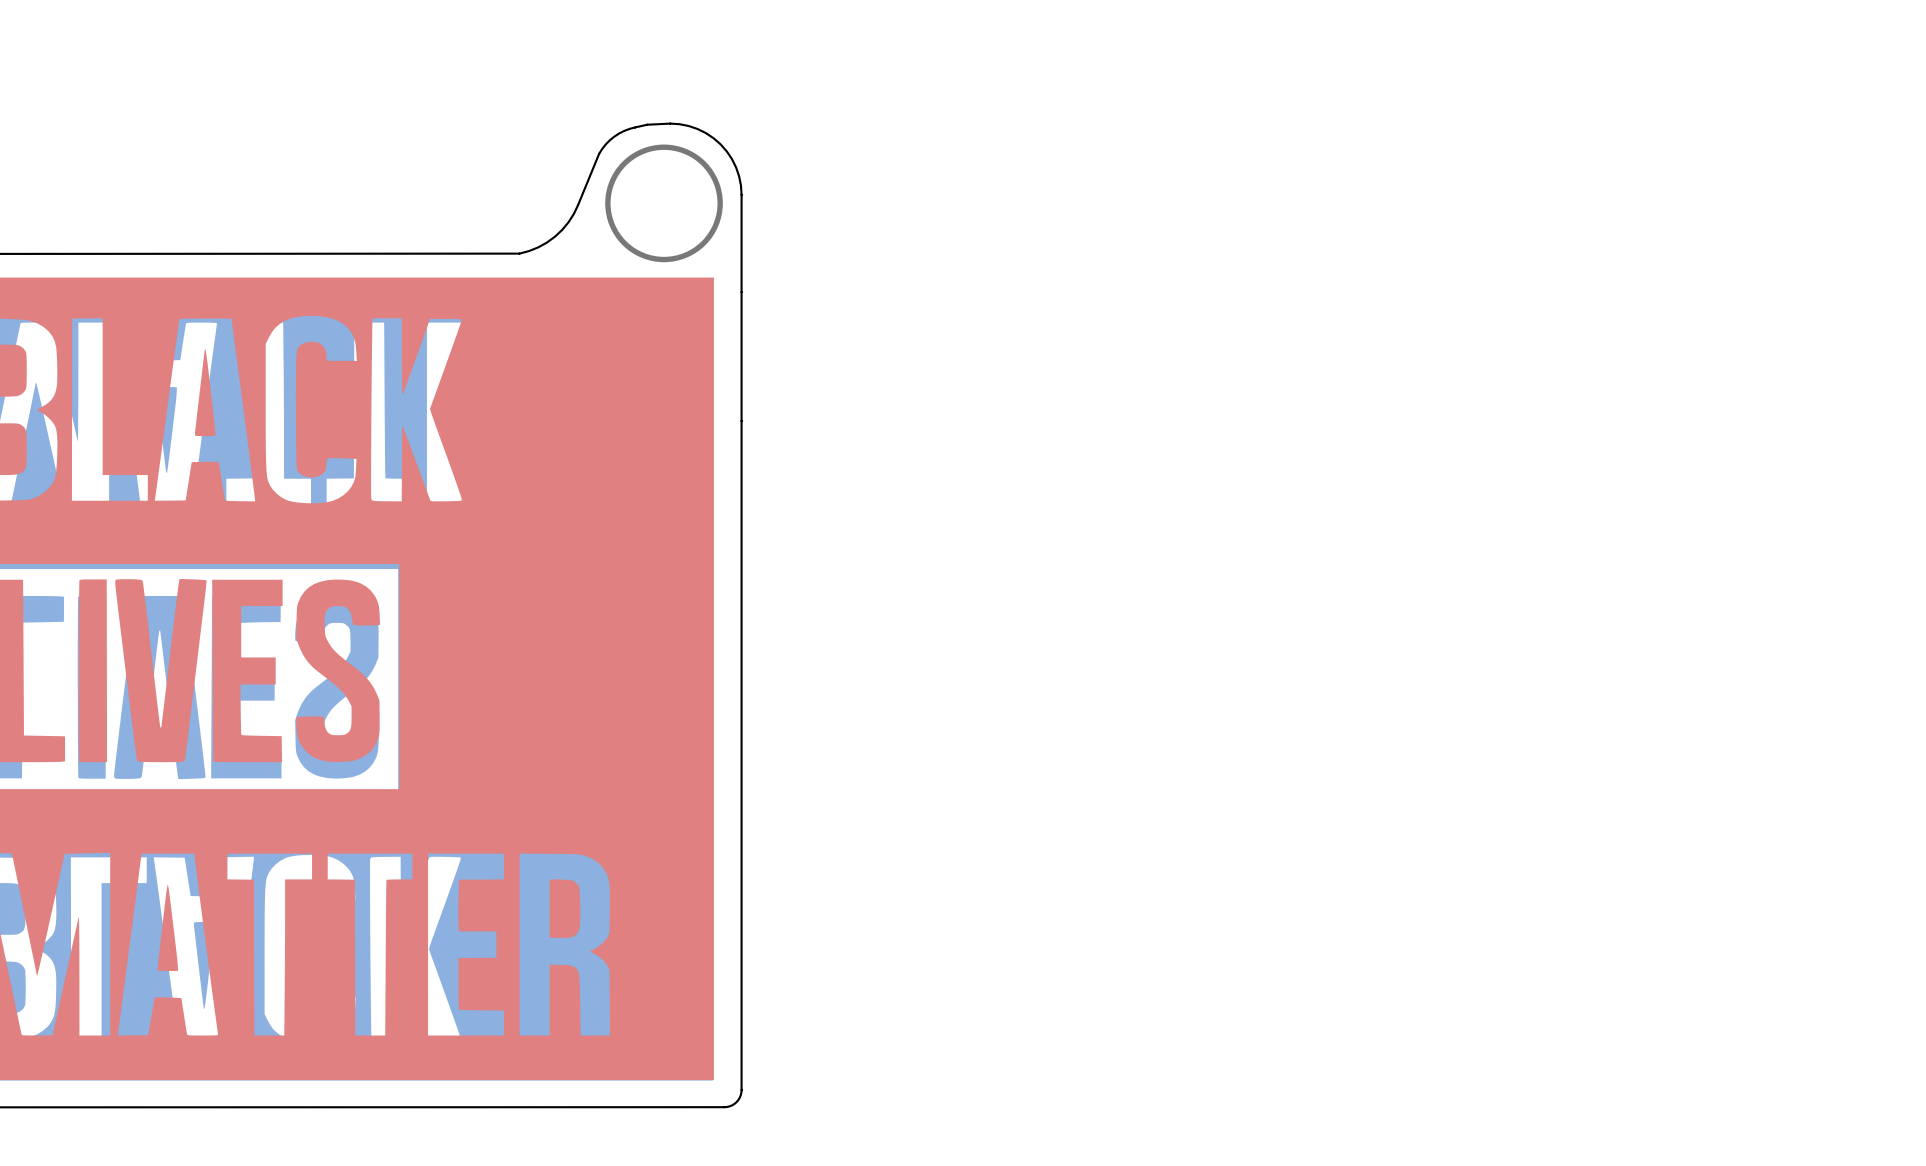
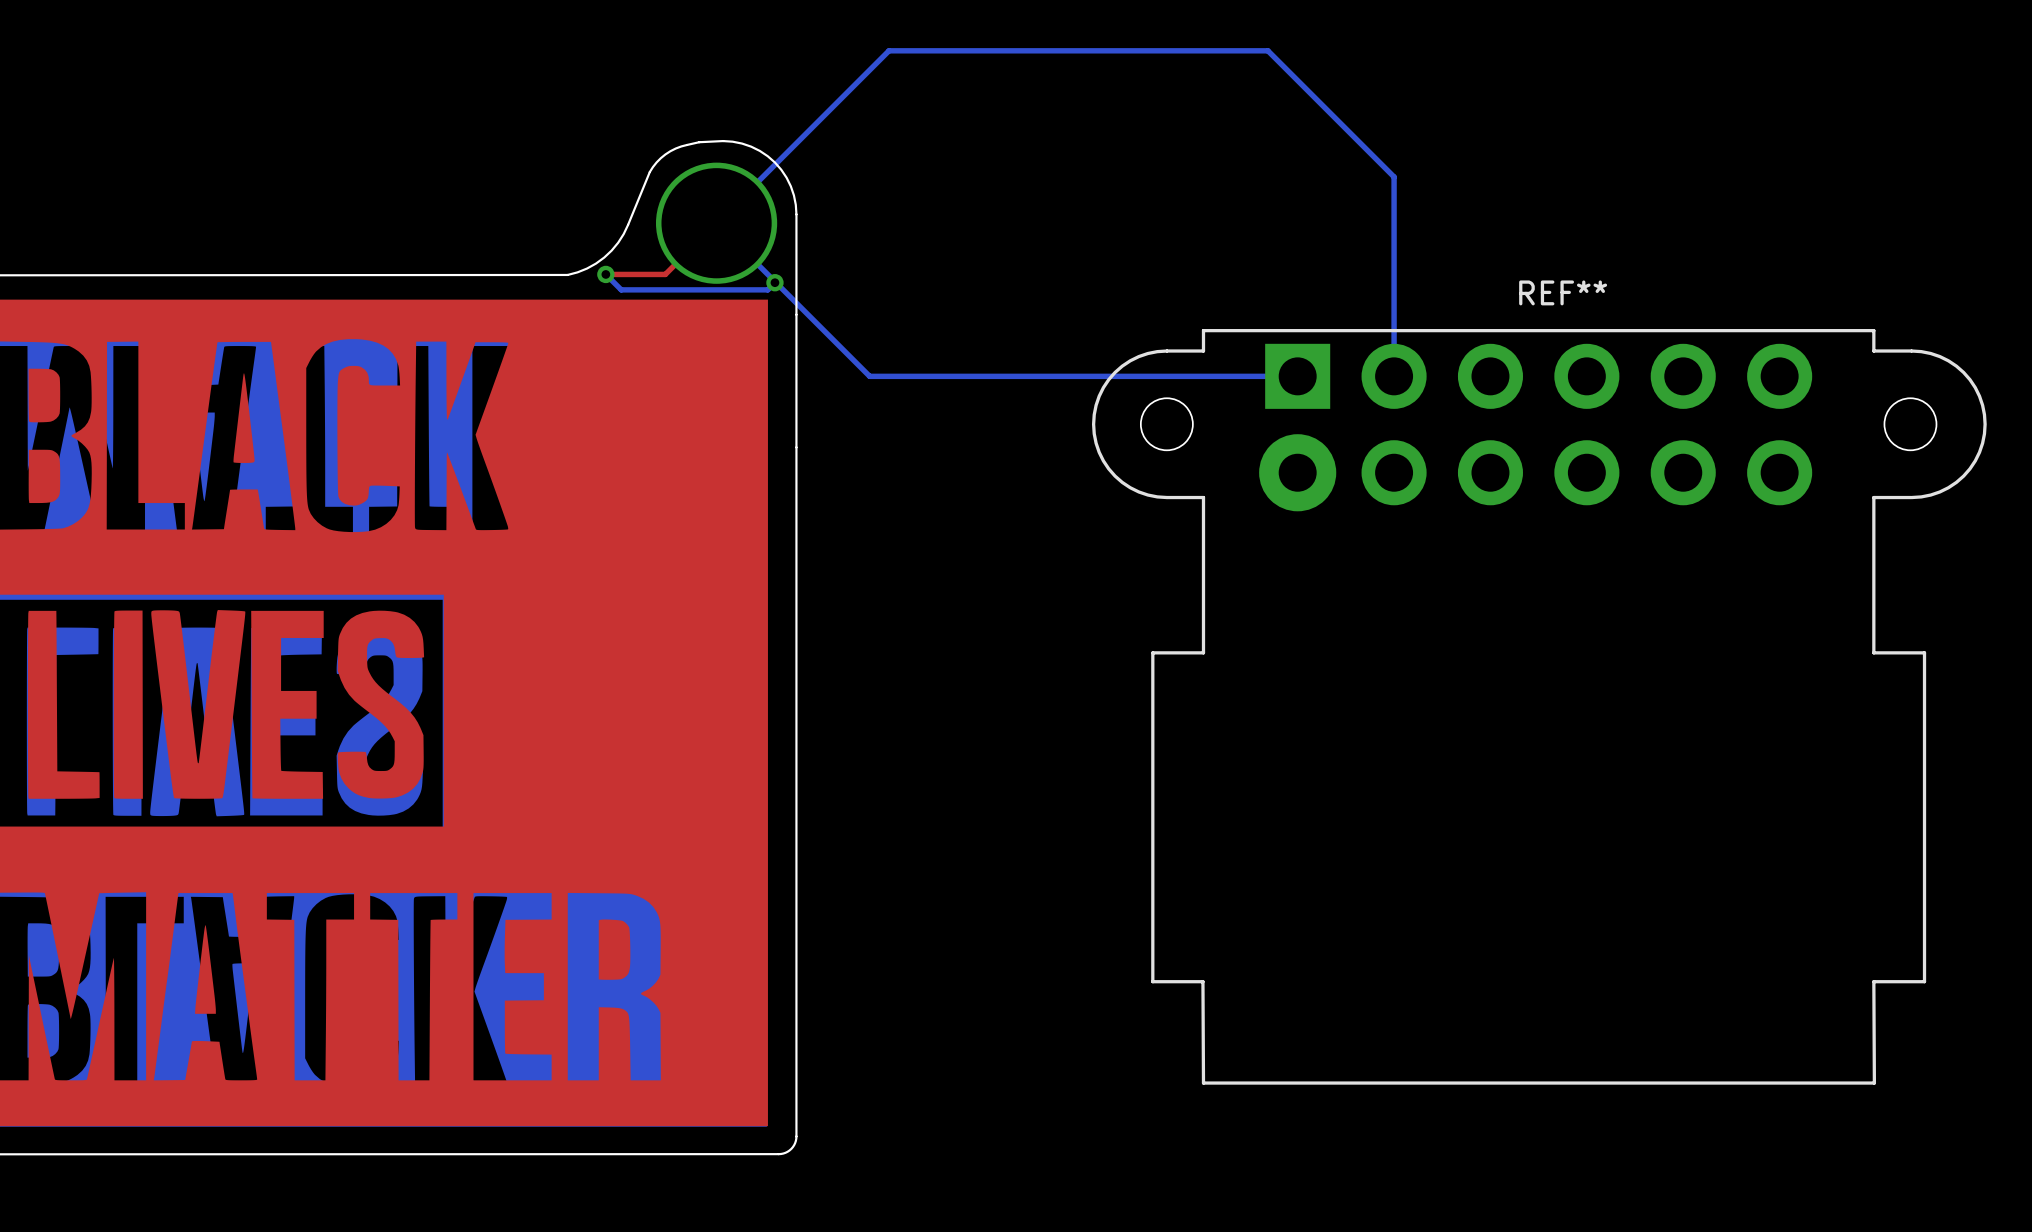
top track: none -> (716, 223) (665, 274) (605, 274)
bottom track: none -> (605, 274) (621, 289) (767, 289) (774, 282)
via: none -> (605, 274)
via: none -> (774, 282)
bottom track: none -> (1297, 376) (869, 376) (716, 223) (888, 50) (1267, 50) (1394, 176) (1394, 376)
REF**: none -> (1539, 706)

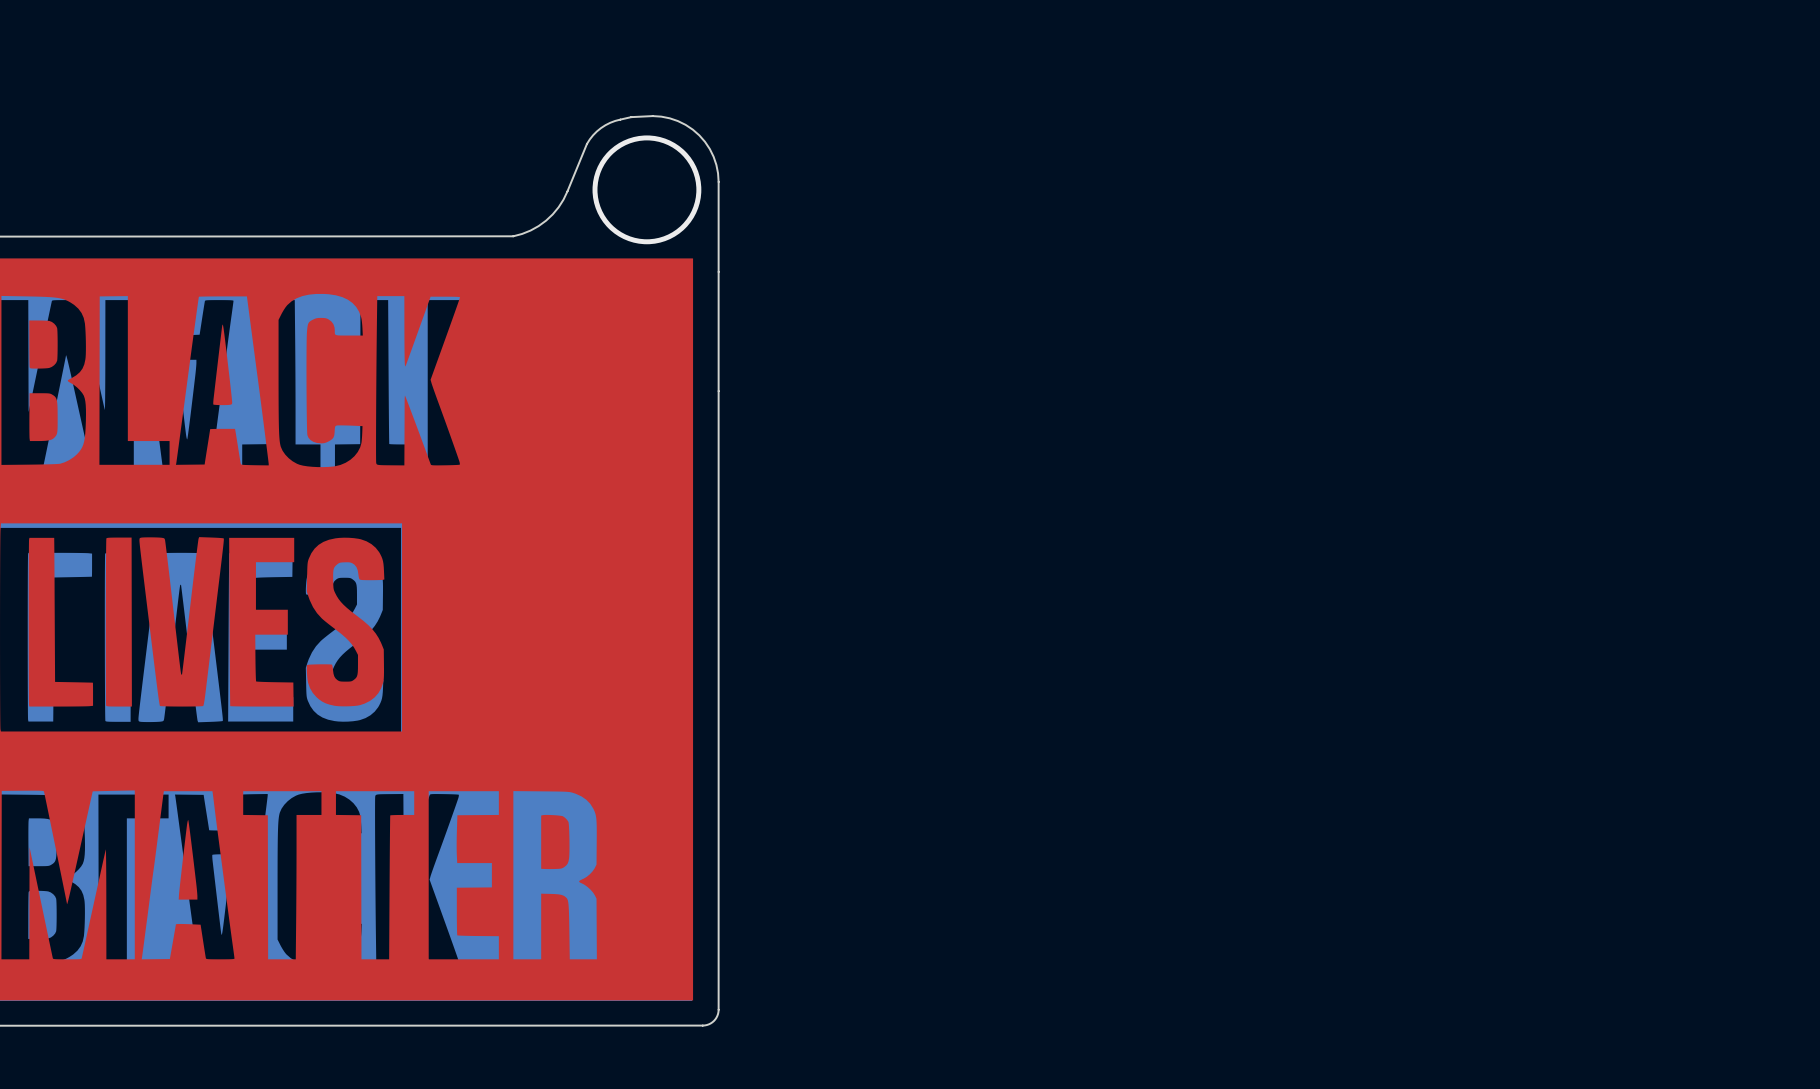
top track: (716, 223) (665, 274) (605, 274) -> none
bottom track: (605, 274) (621, 289) (767, 289) (774, 282) -> none
via: (605, 274) -> none
via: (774, 282) -> none
bottom track: (1297, 376) (869, 376) (716, 223) (888, 50) (1267, 50) (1394, 176) (1394, 376) -> none
REF**: (1539, 706) -> none

